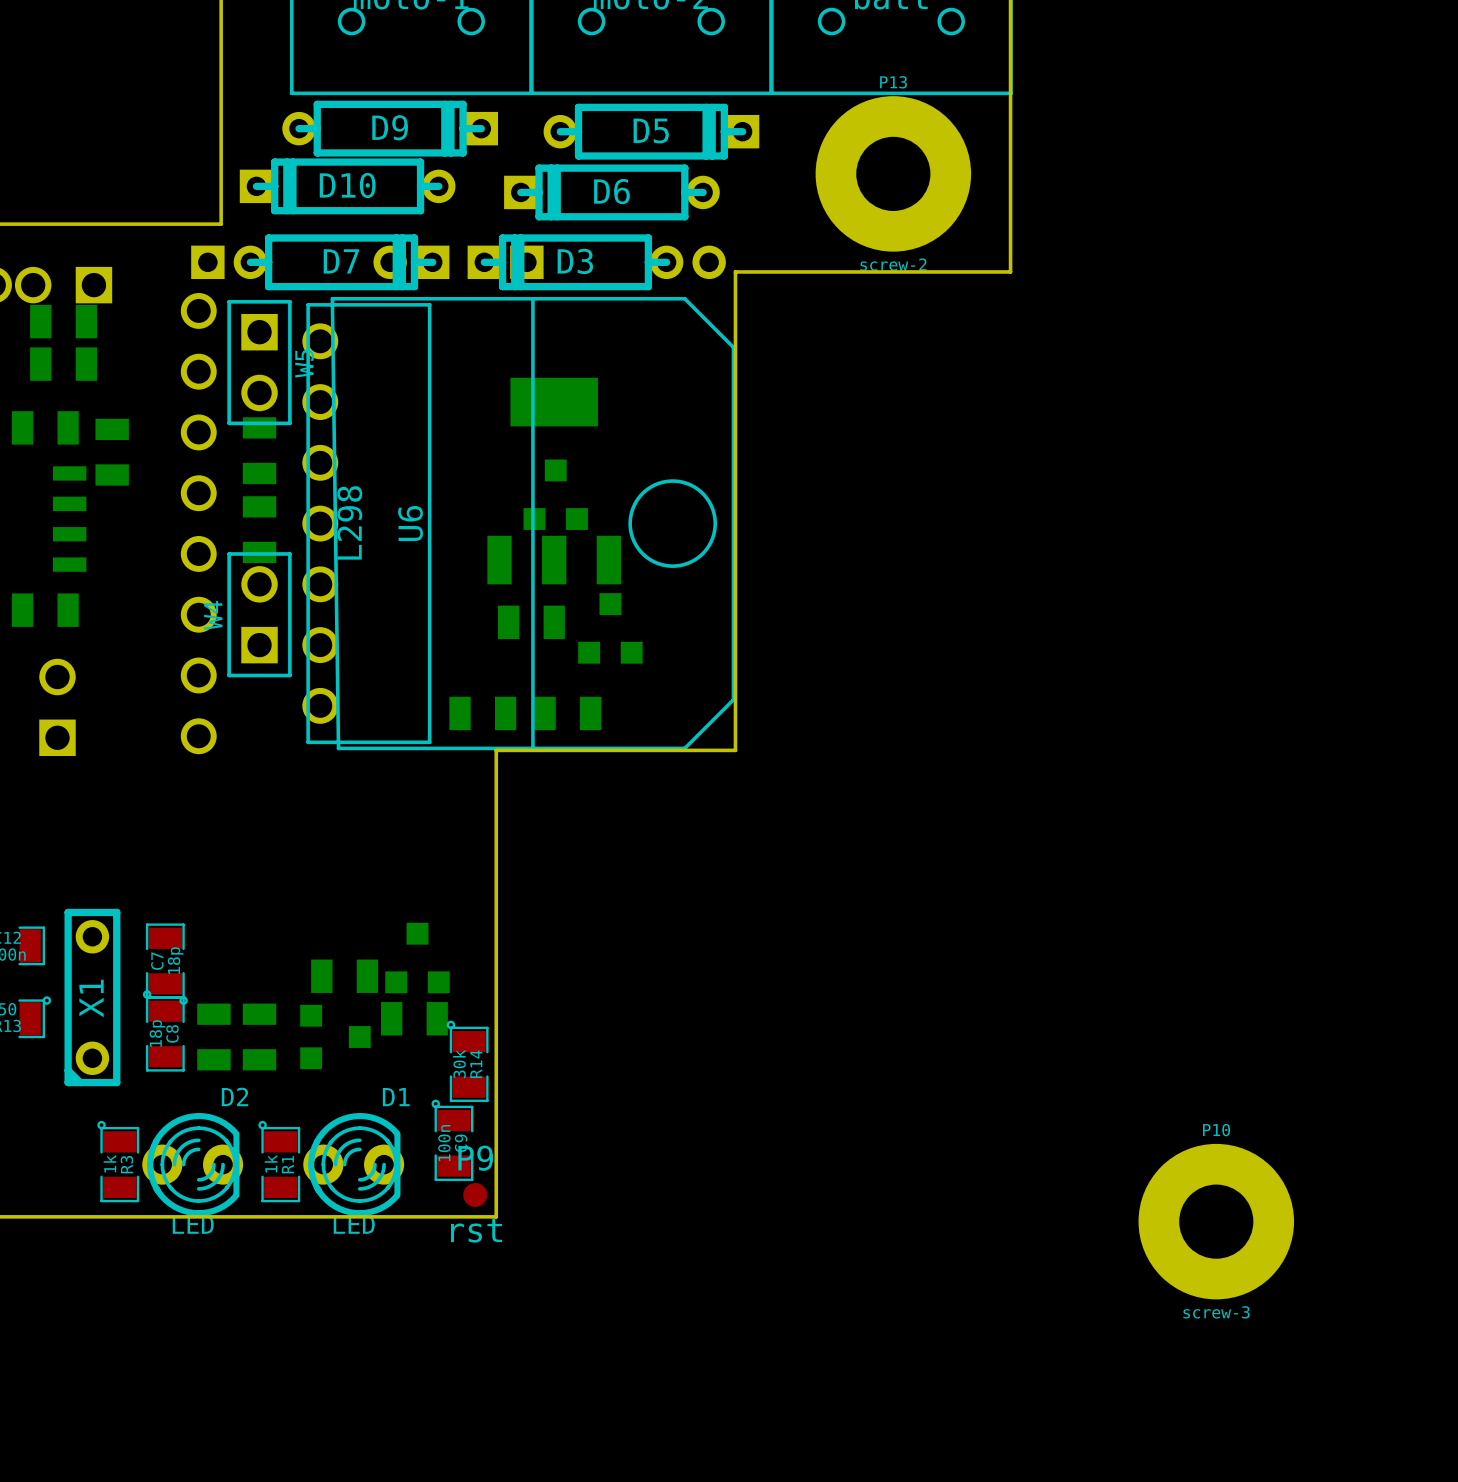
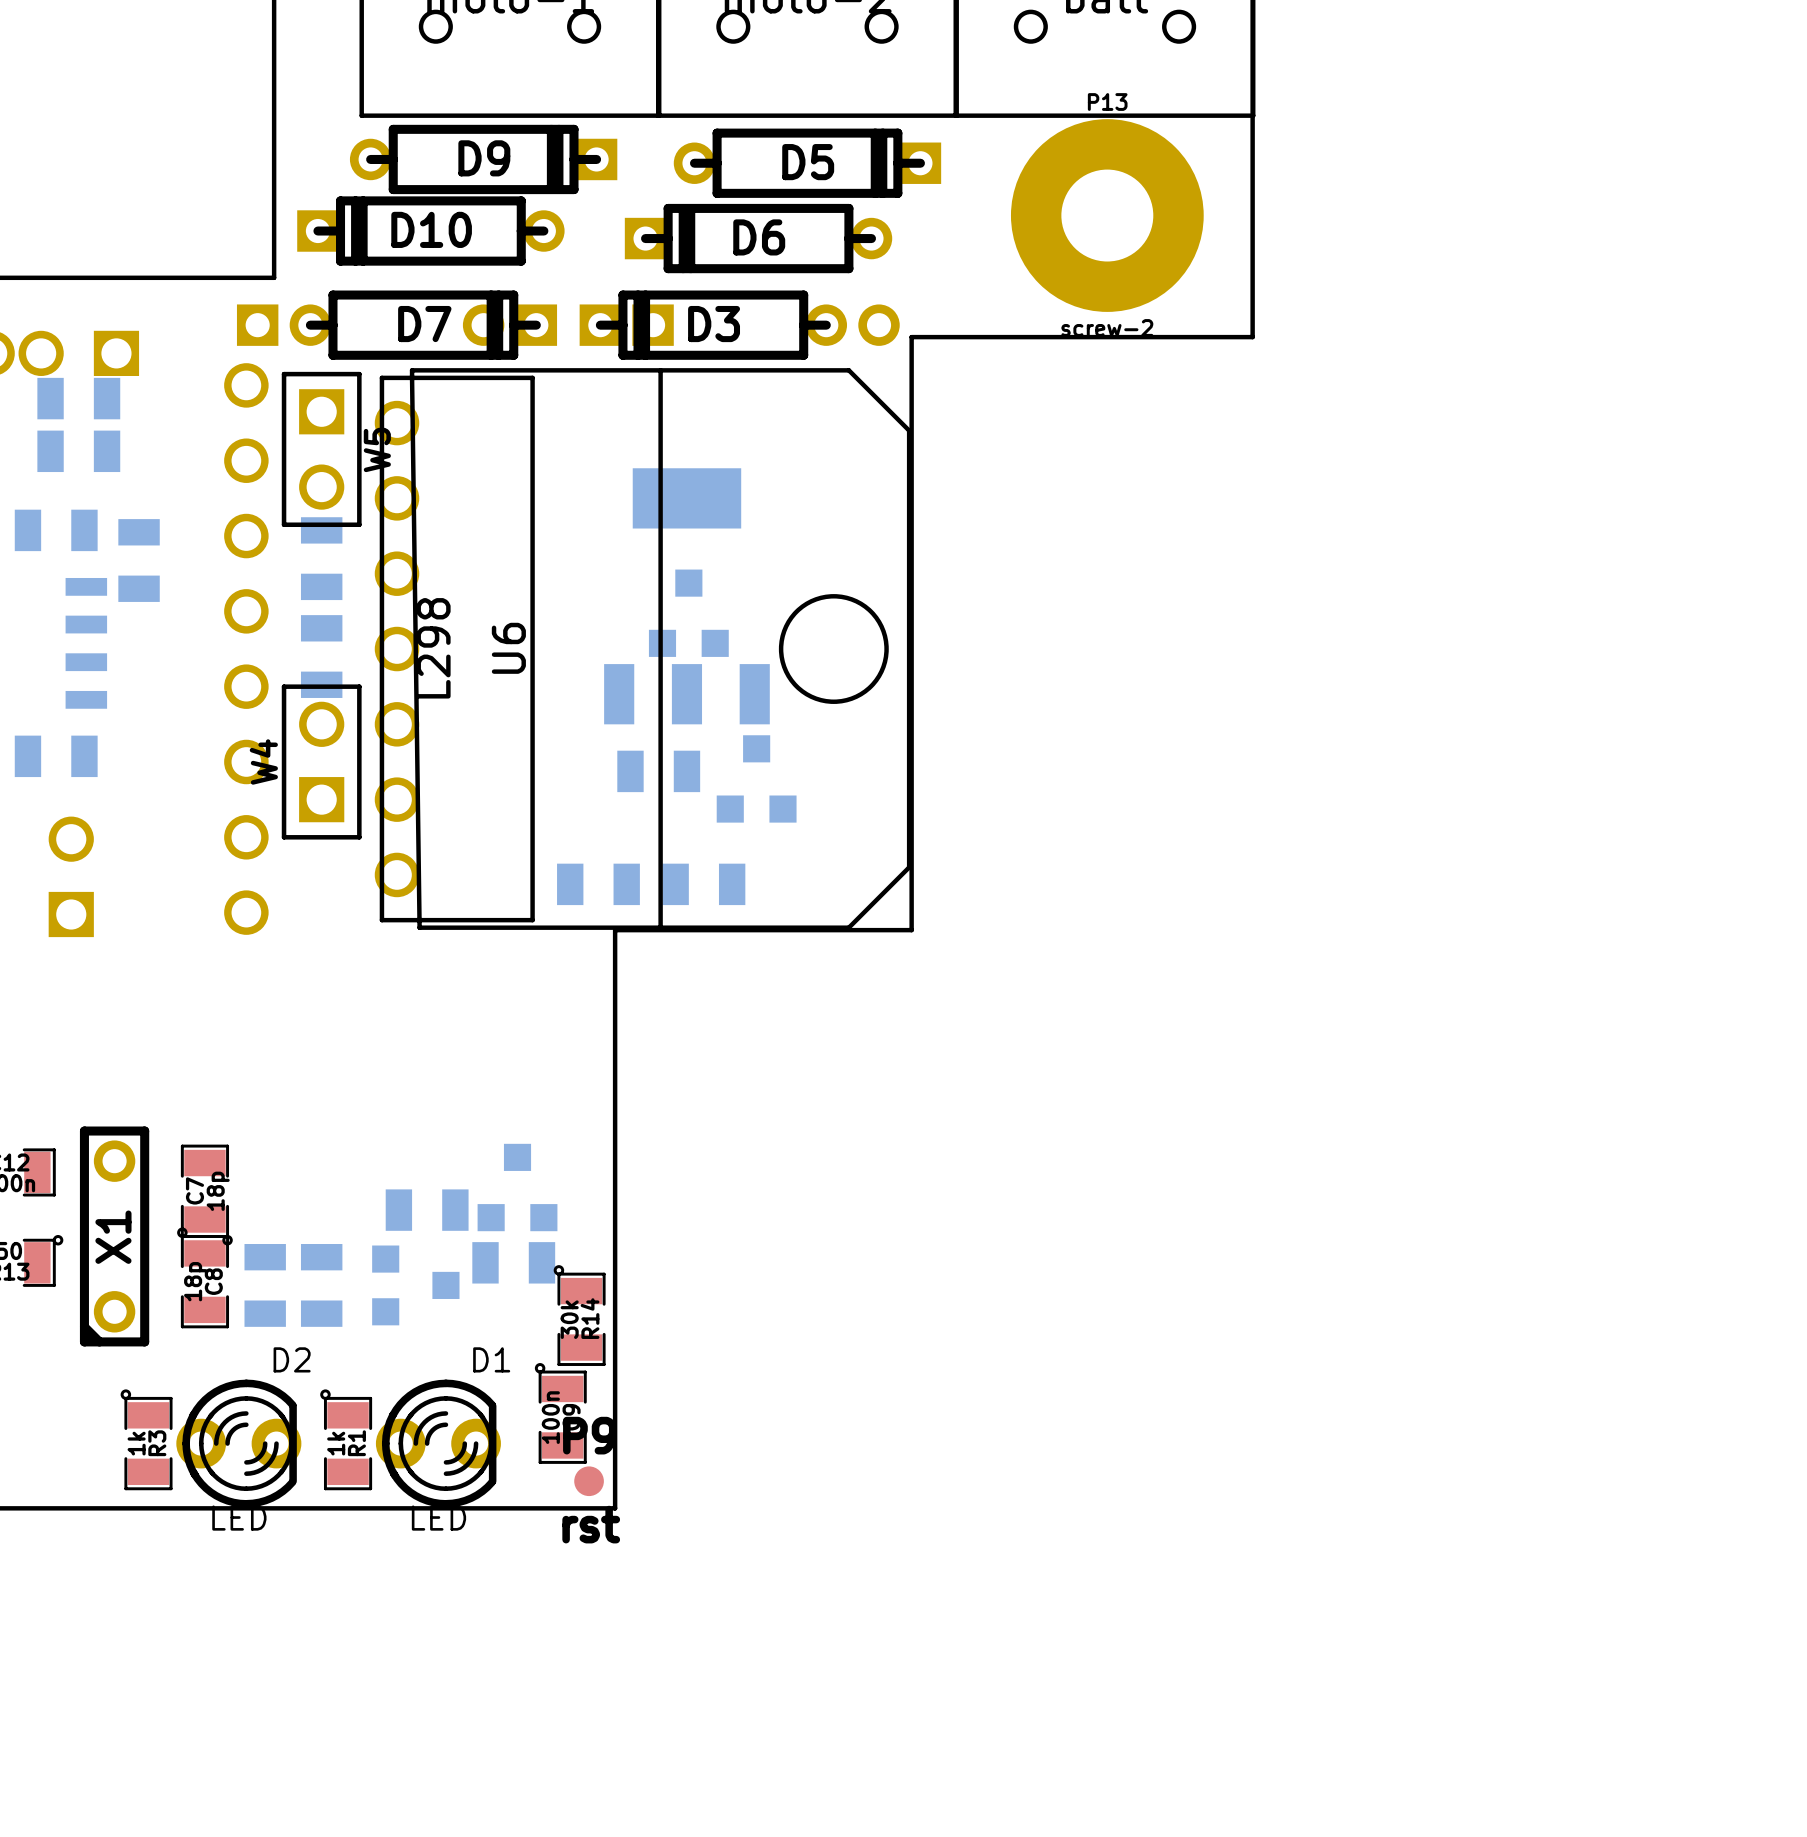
P10: screw-3 (1216, 1221) -> none

